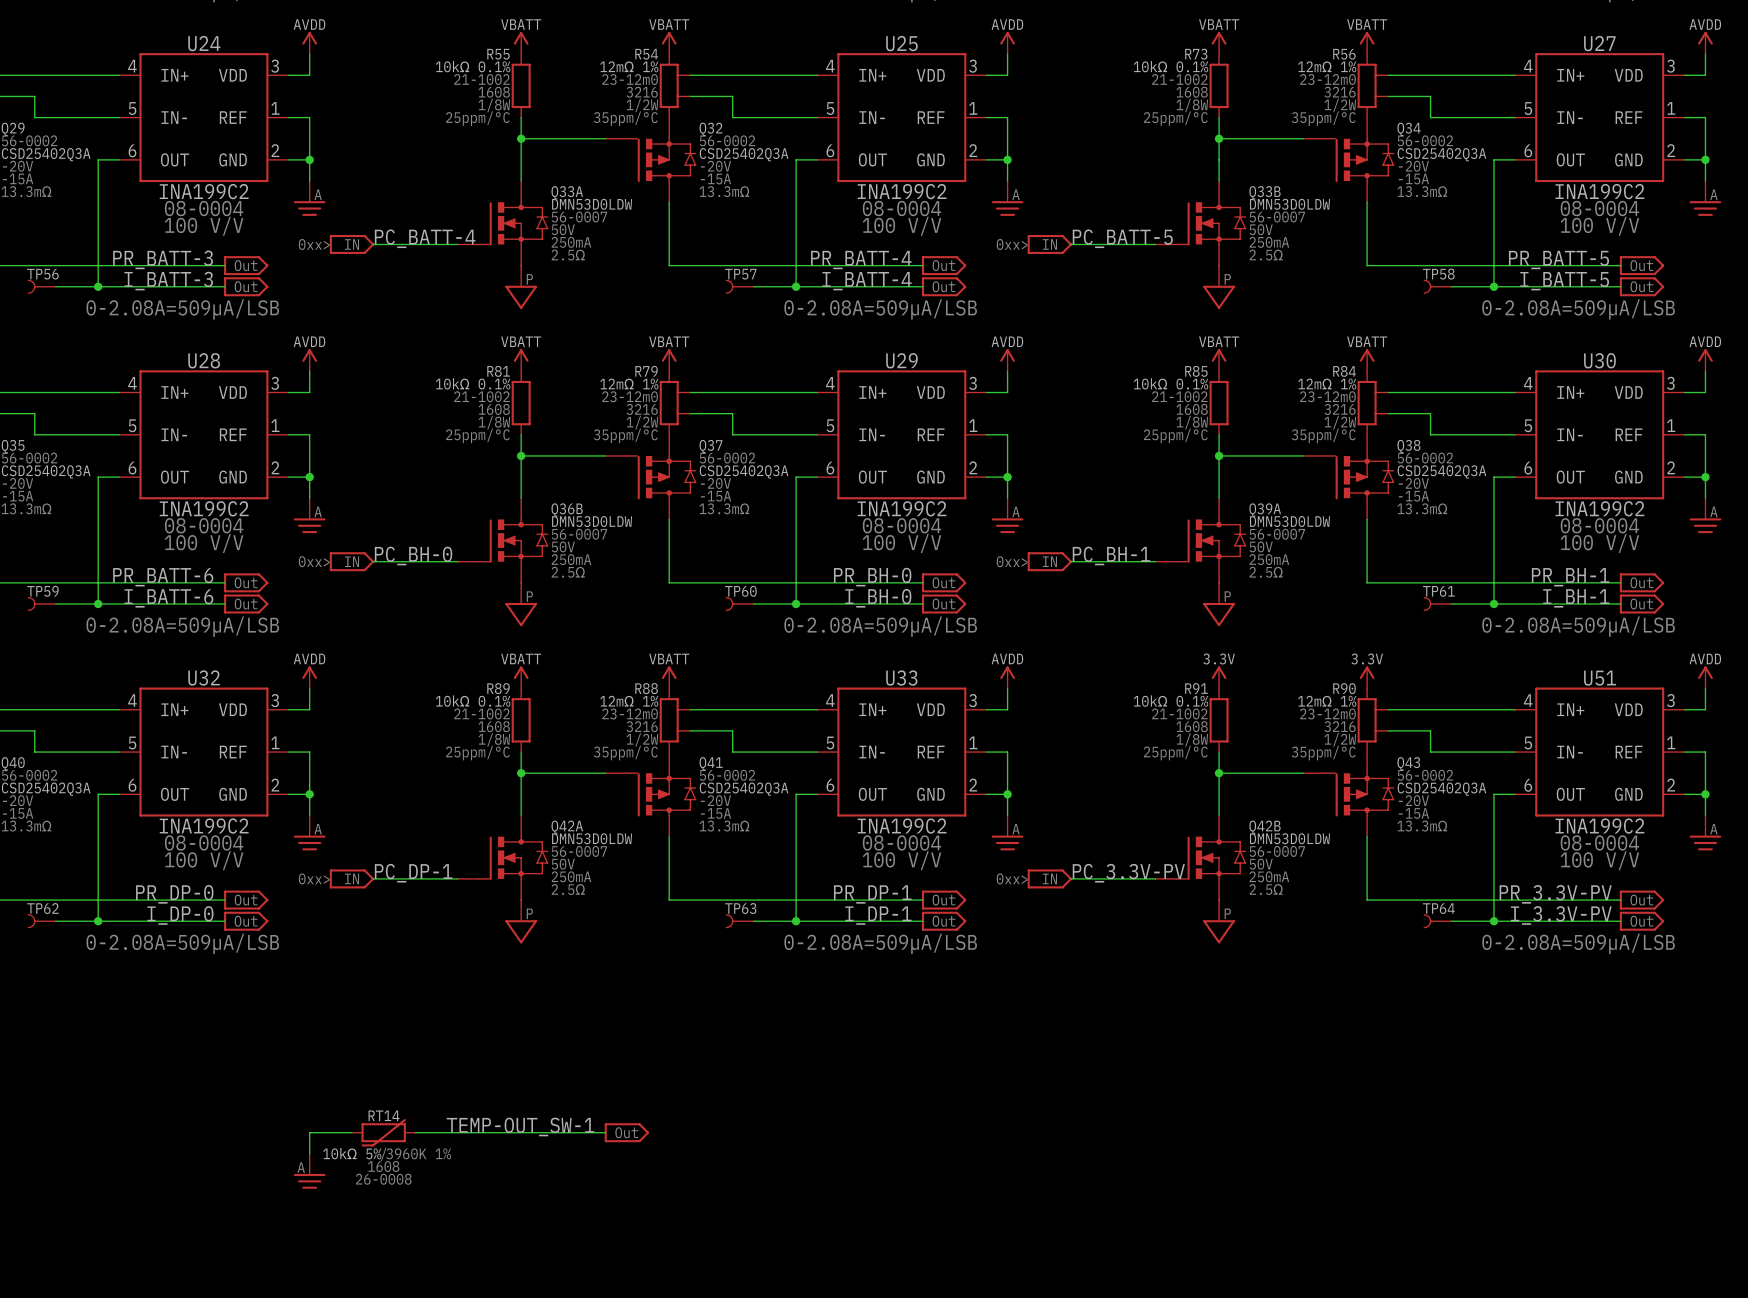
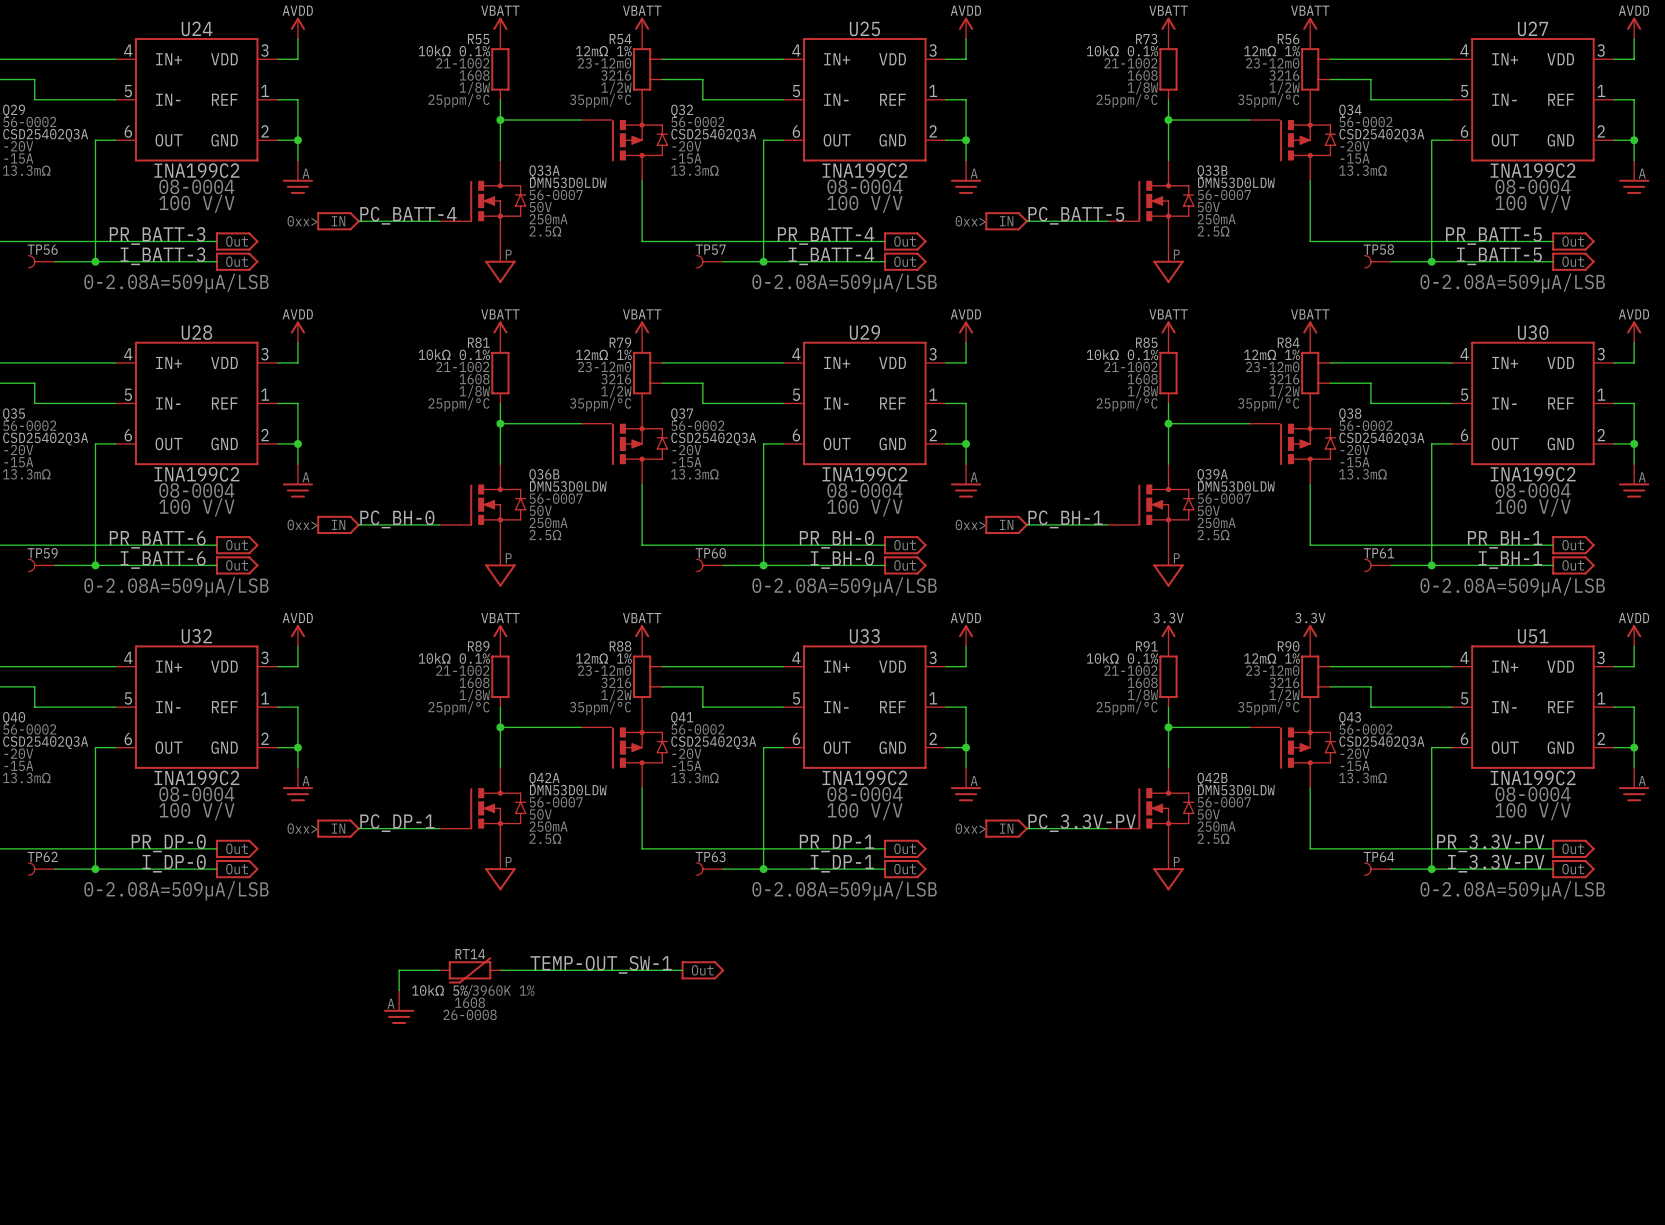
label position: TEMP-OUT_SW-1 (520, 1126) -> TEMP-OUT_SW-1 (601, 964)
wire: (351, 1132) (309, 1132) (309, 1153) -> (439, 970) (399, 970) (399, 990)
RT14 position: (383, 1132) -> (470, 970)
wire: (415, 1132) (605, 1132) -> (500, 970) (682, 970)
part position: (626, 1132) -> (702, 970)
power symbol position: (309, 1171) -> (399, 1007)

